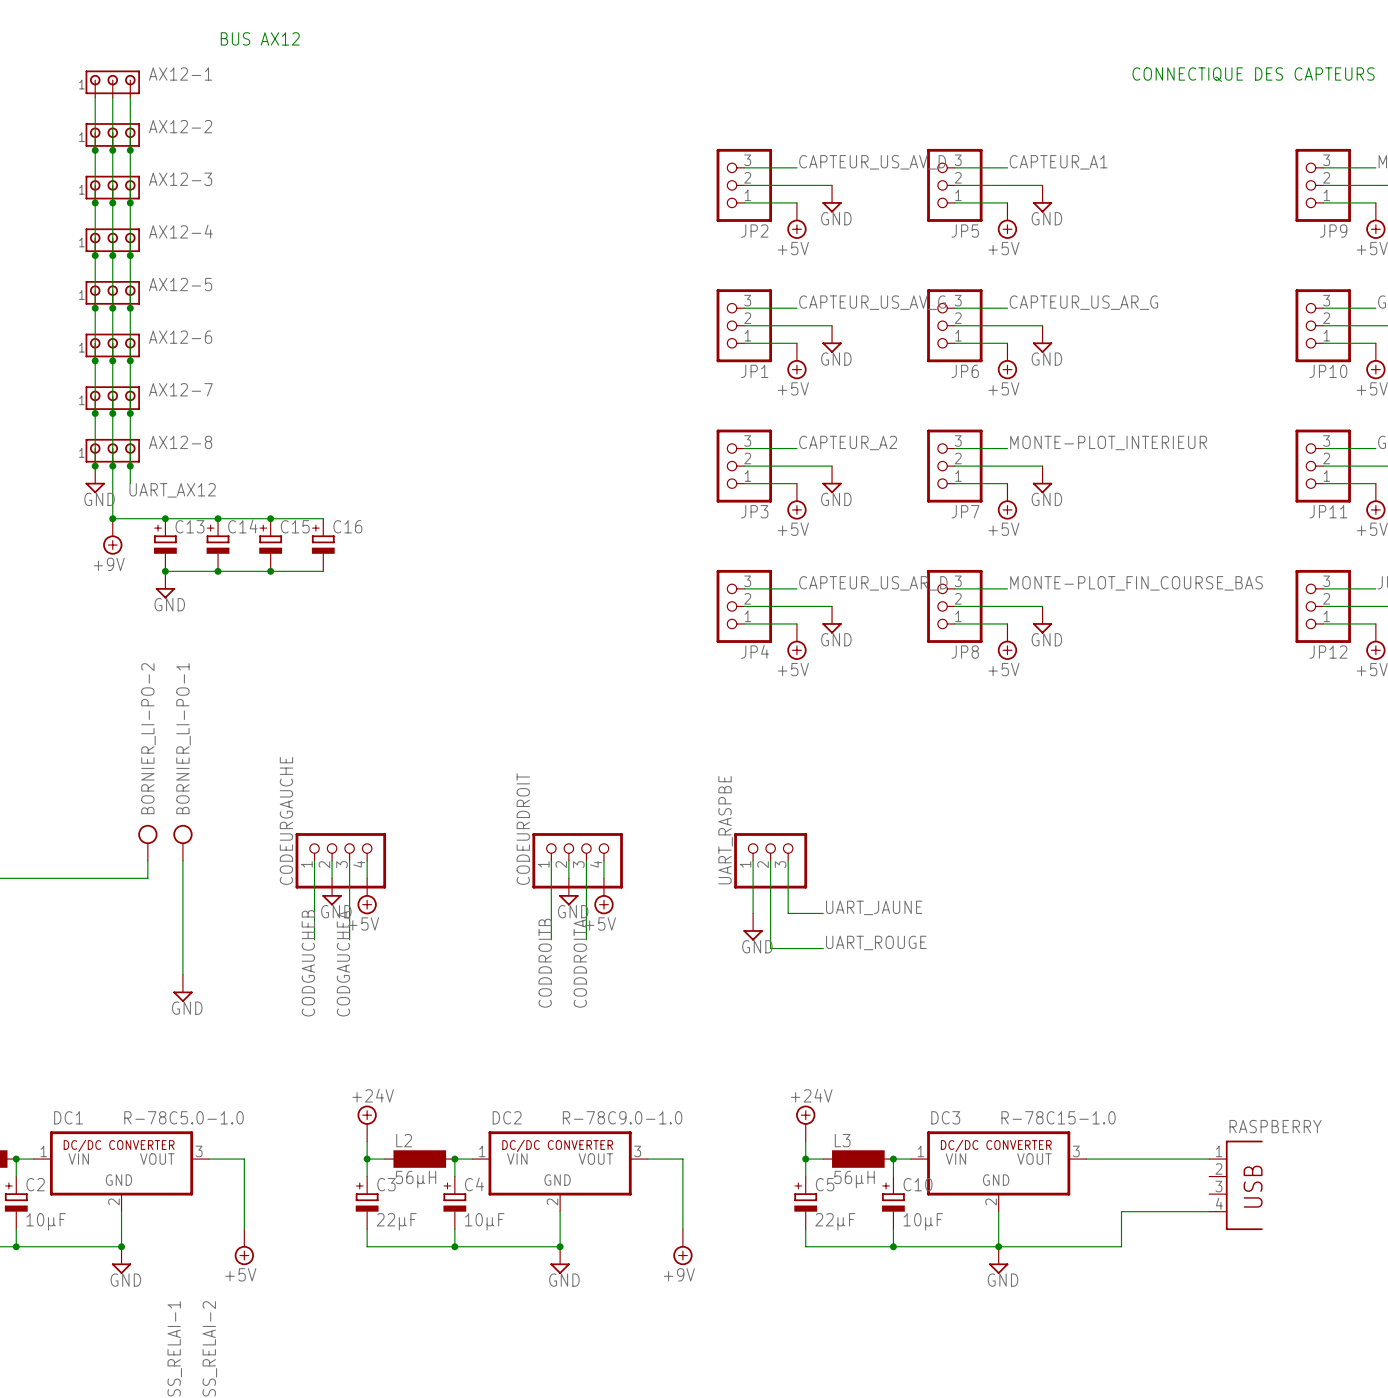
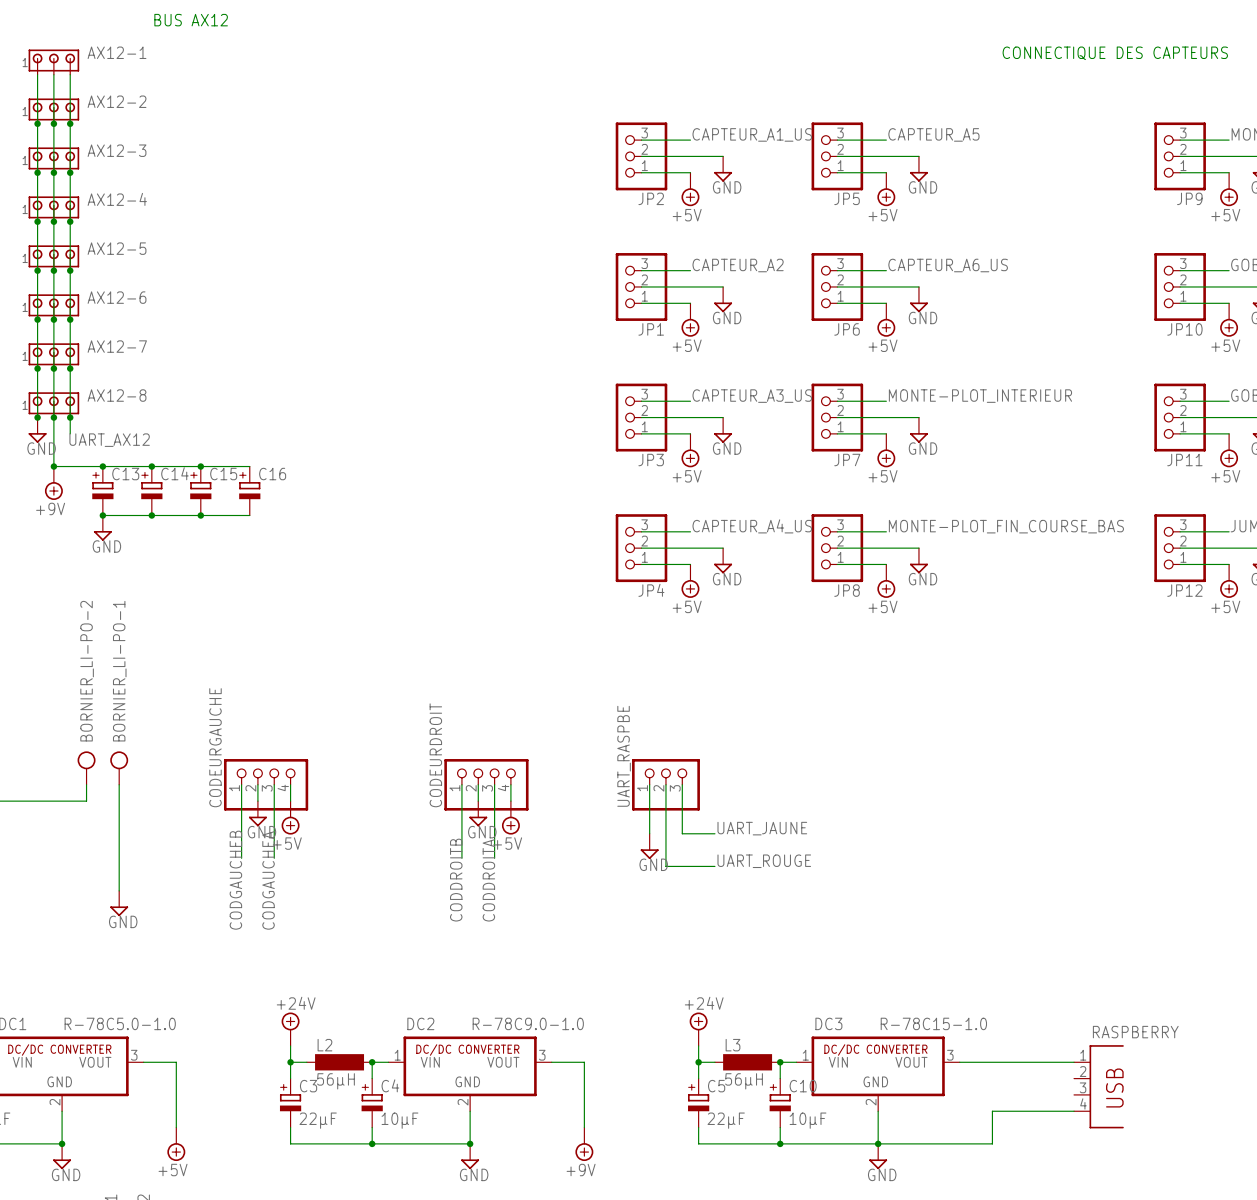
label: CAPTEUR_US_AV_D (872, 162) -> CAPTEUR_A1_US (752, 134)
label: CAPTEUR_A1 (1058, 162) -> CAPTEUR_A5 (933, 134)
label: CAPTEUR_US_AV_G (872, 302) -> CAPTEUR_A2 (738, 265)
label: CAPTEUR_US_AR_G (1083, 302) -> CAPTEUR_A6_US (948, 265)
label: CAPTEUR_A2 (848, 442) -> CAPTEUR_A3_US (752, 396)
label: CAPTEUR_US_AR_D (873, 583) -> CAPTEUR_A4_US (752, 526)

